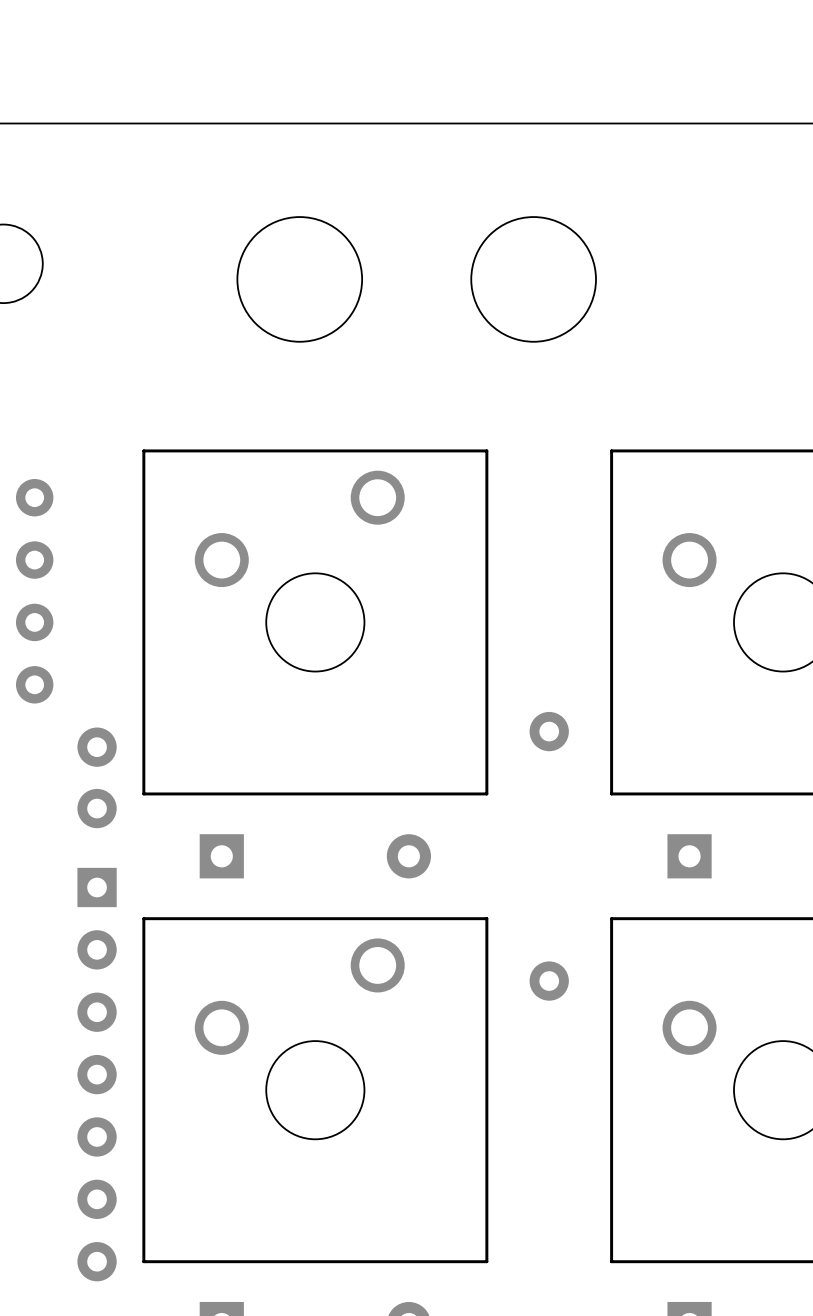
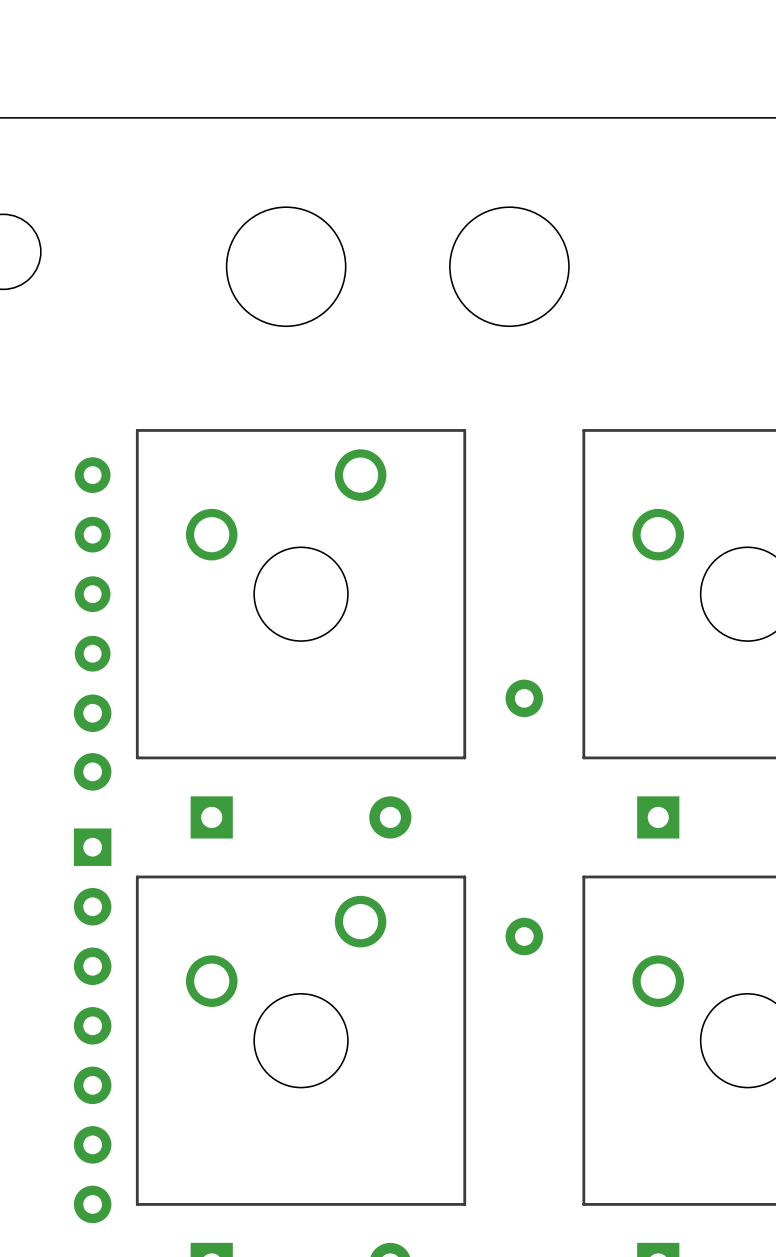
part position: (34, 591) -> (92, 564)

